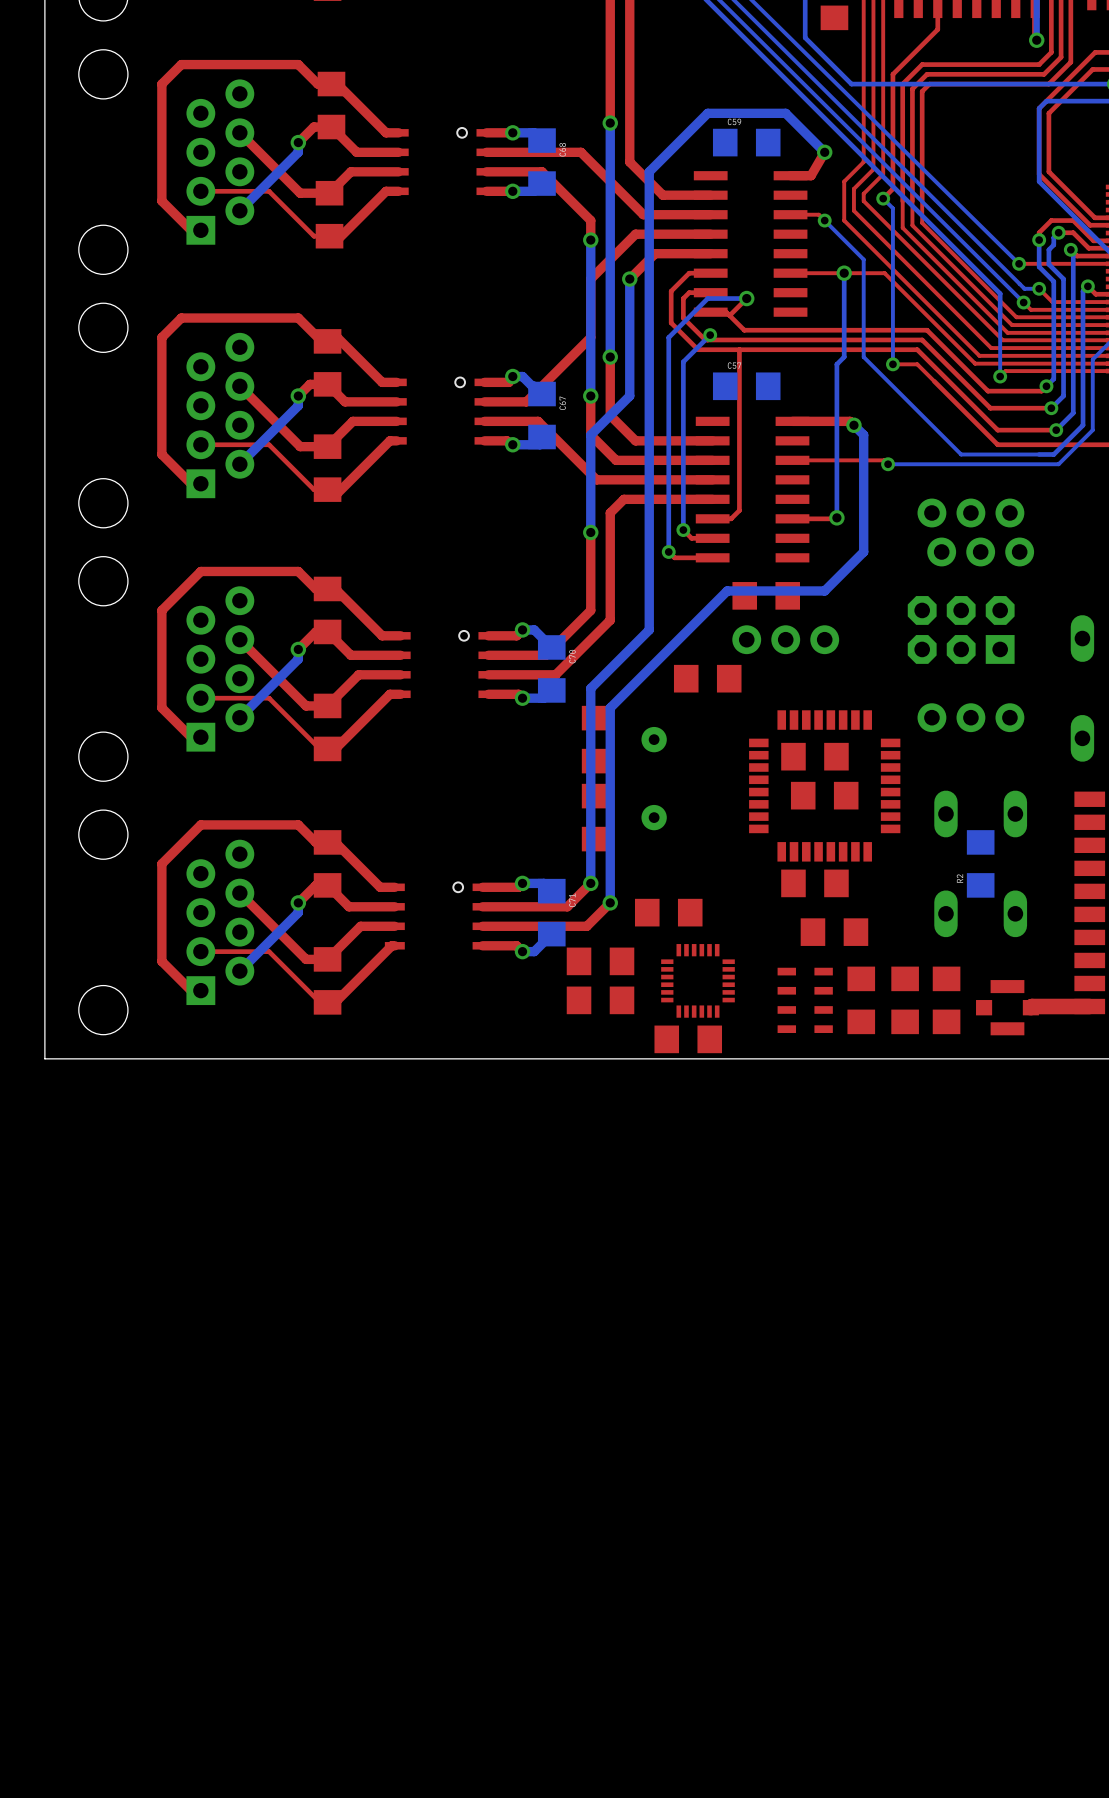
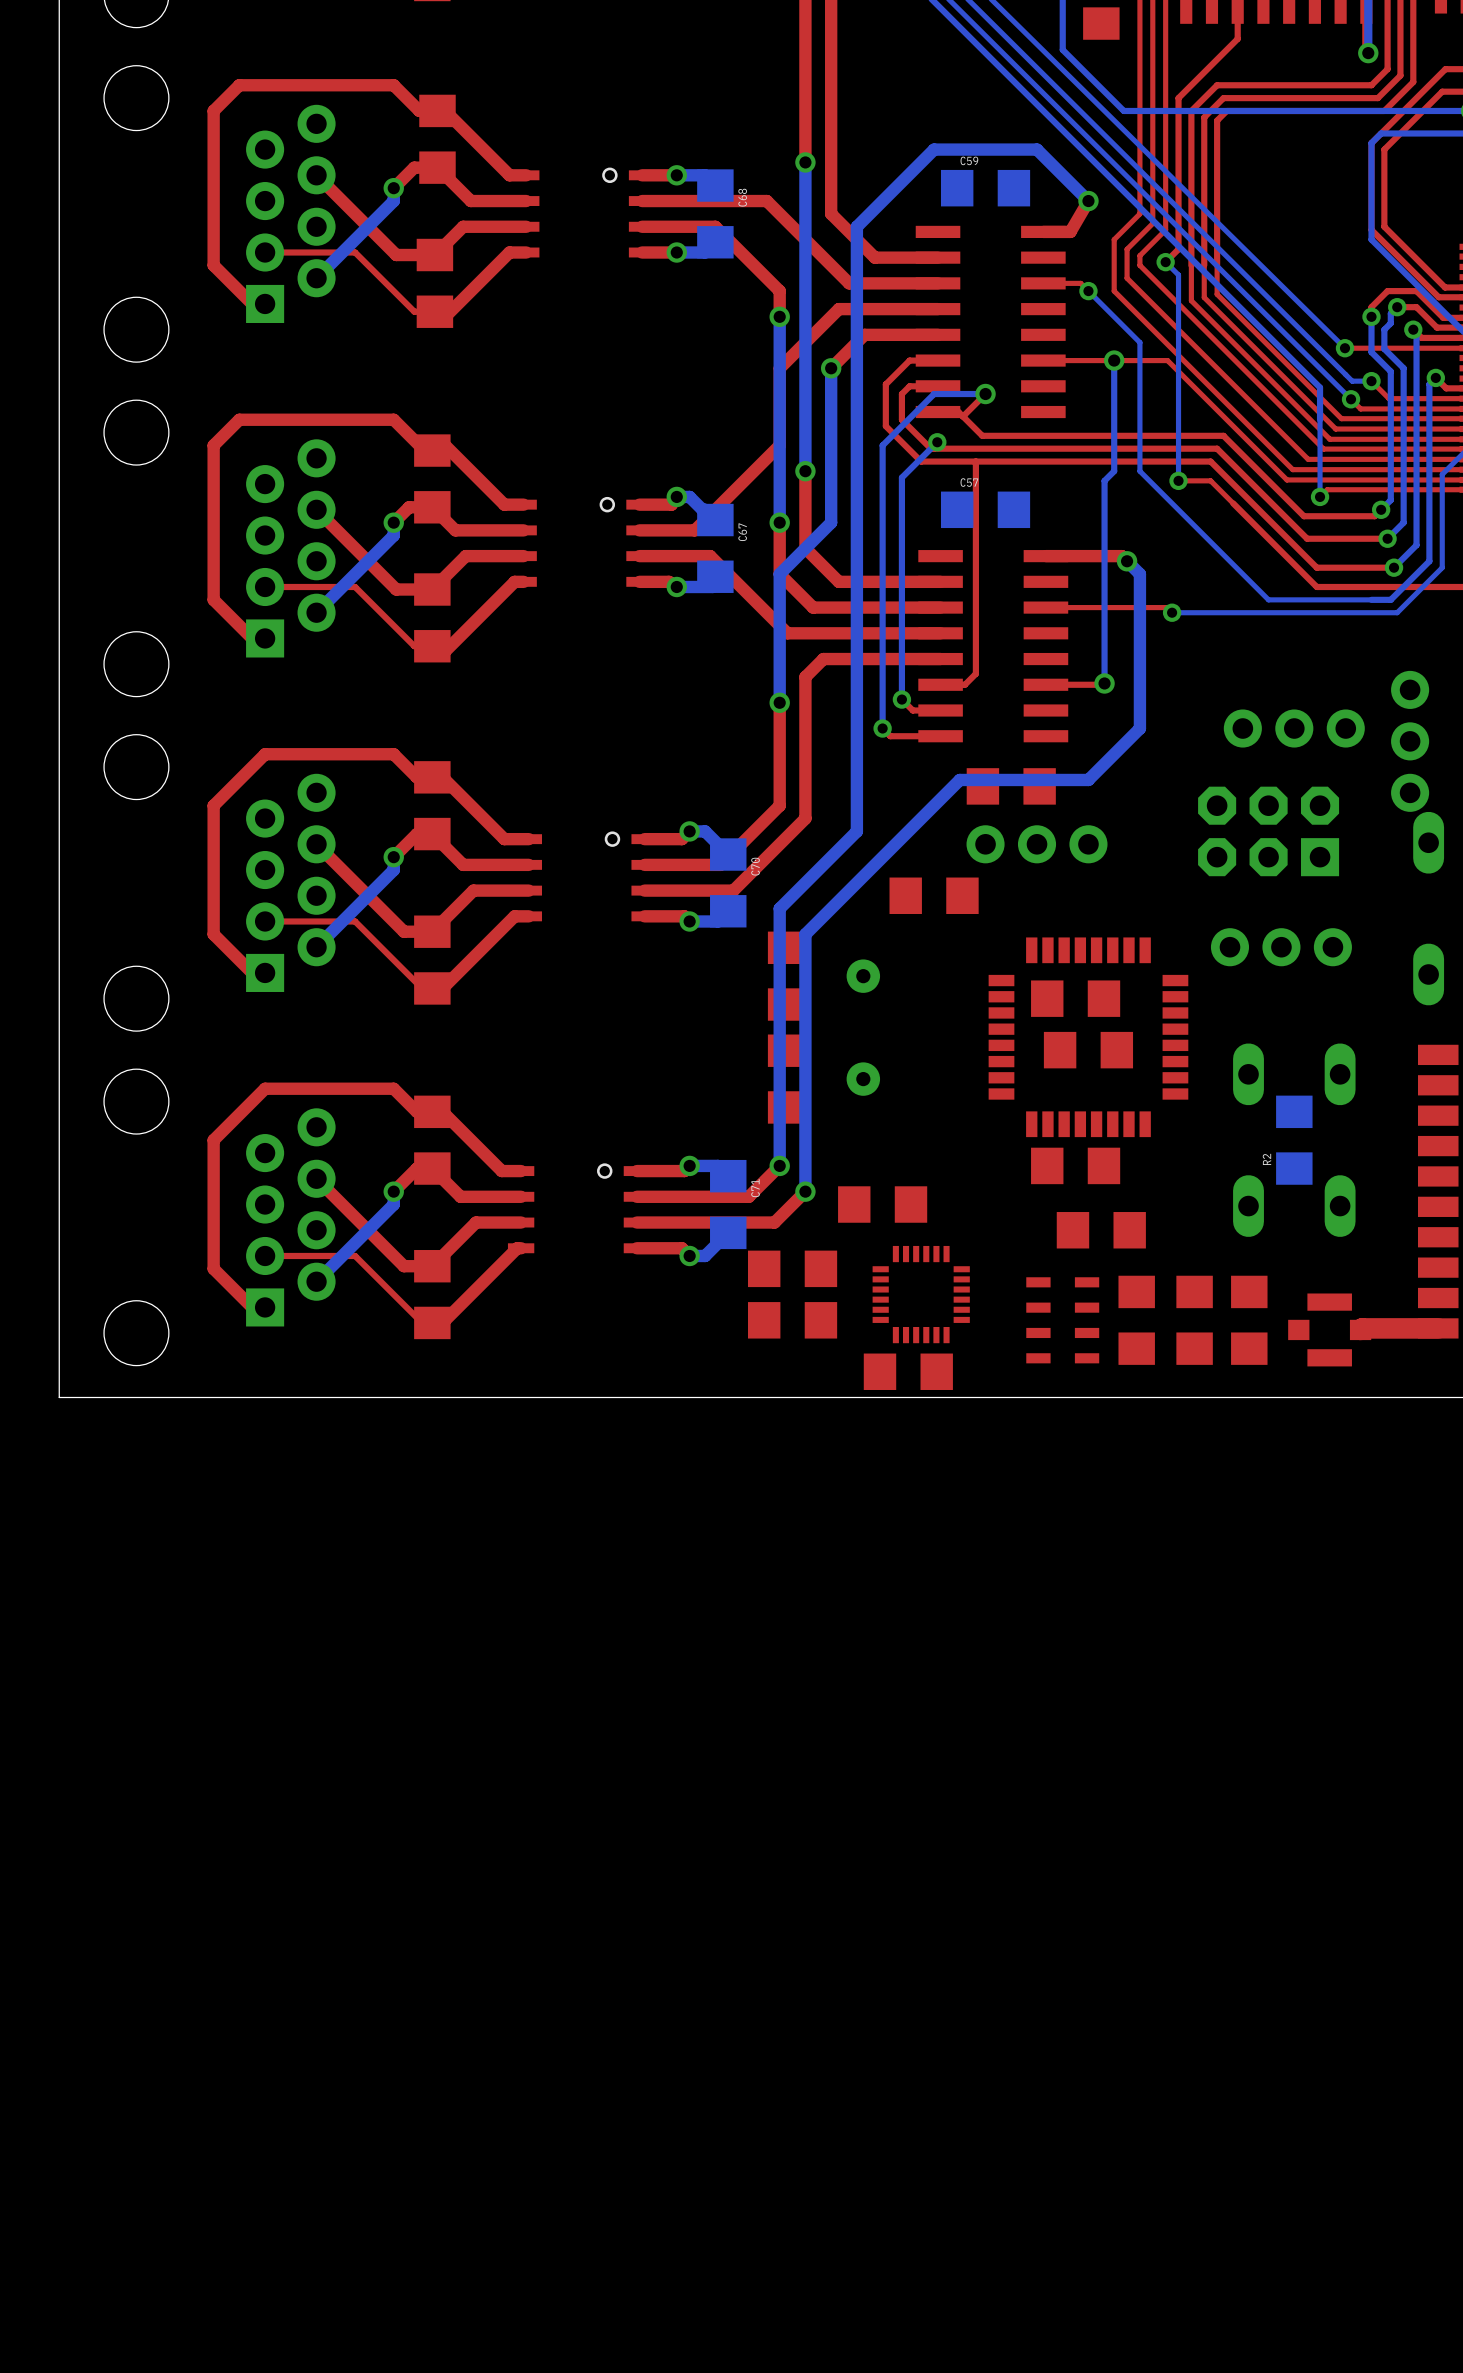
part rotation: 0° (970, 512) -> 90° clockwise (1410, 741)
part position: (970, 512) -> (1410, 741)

